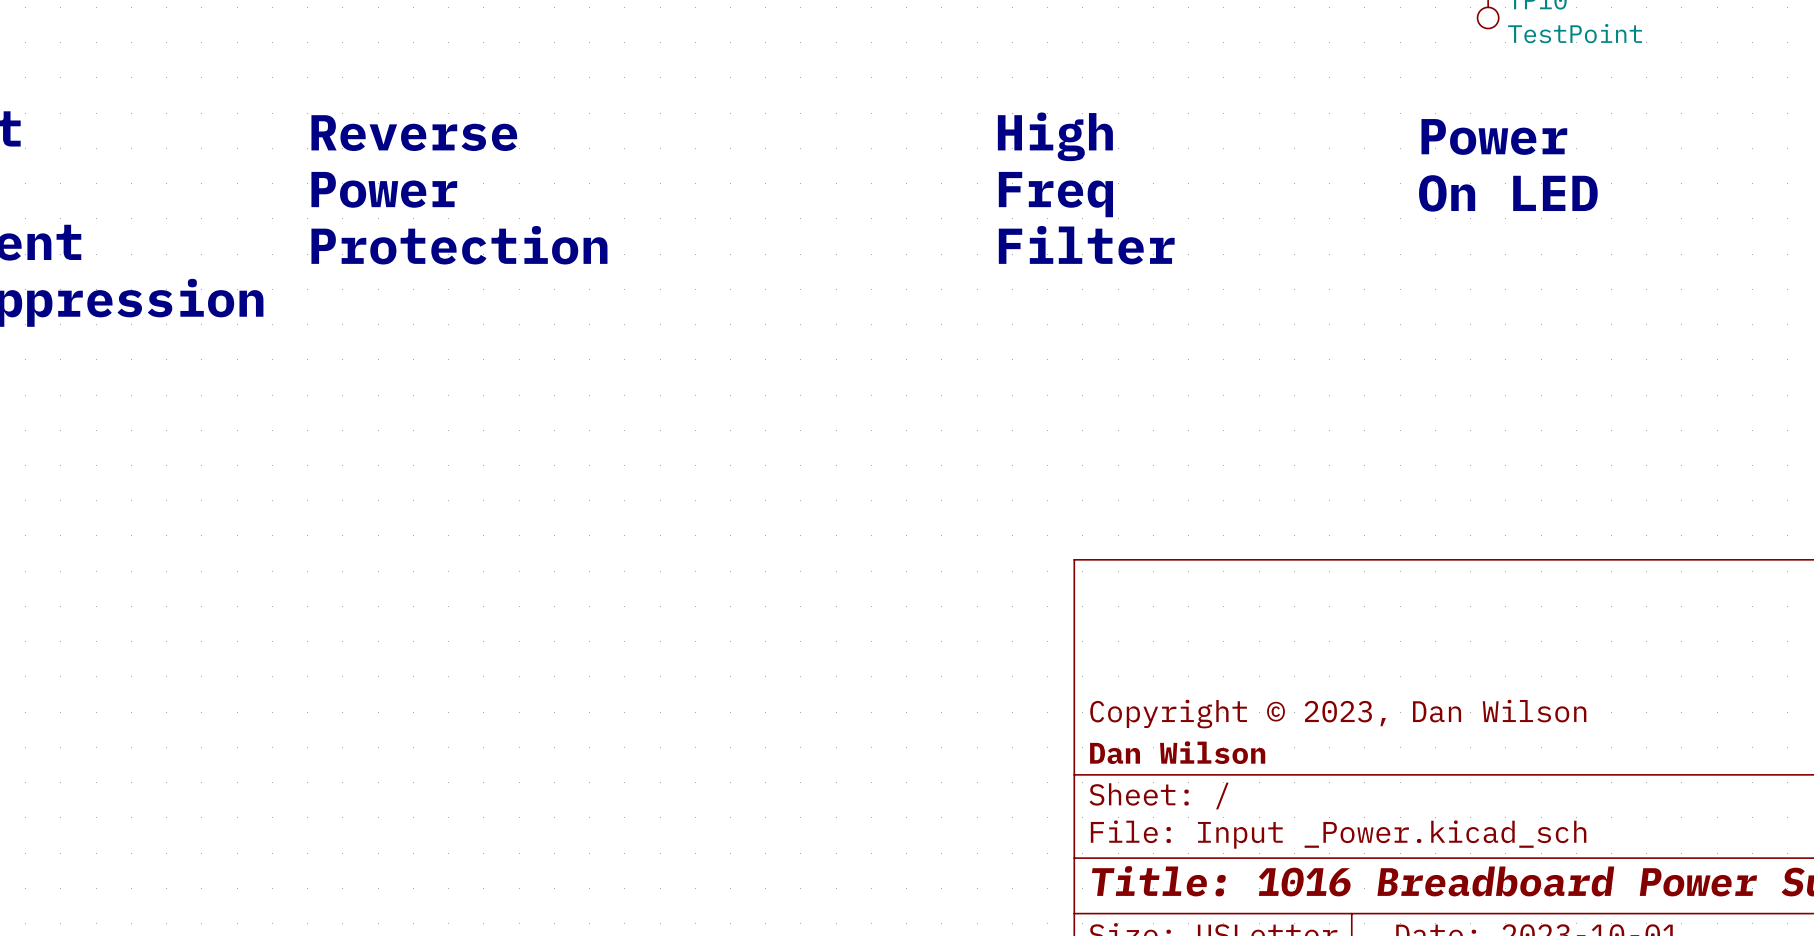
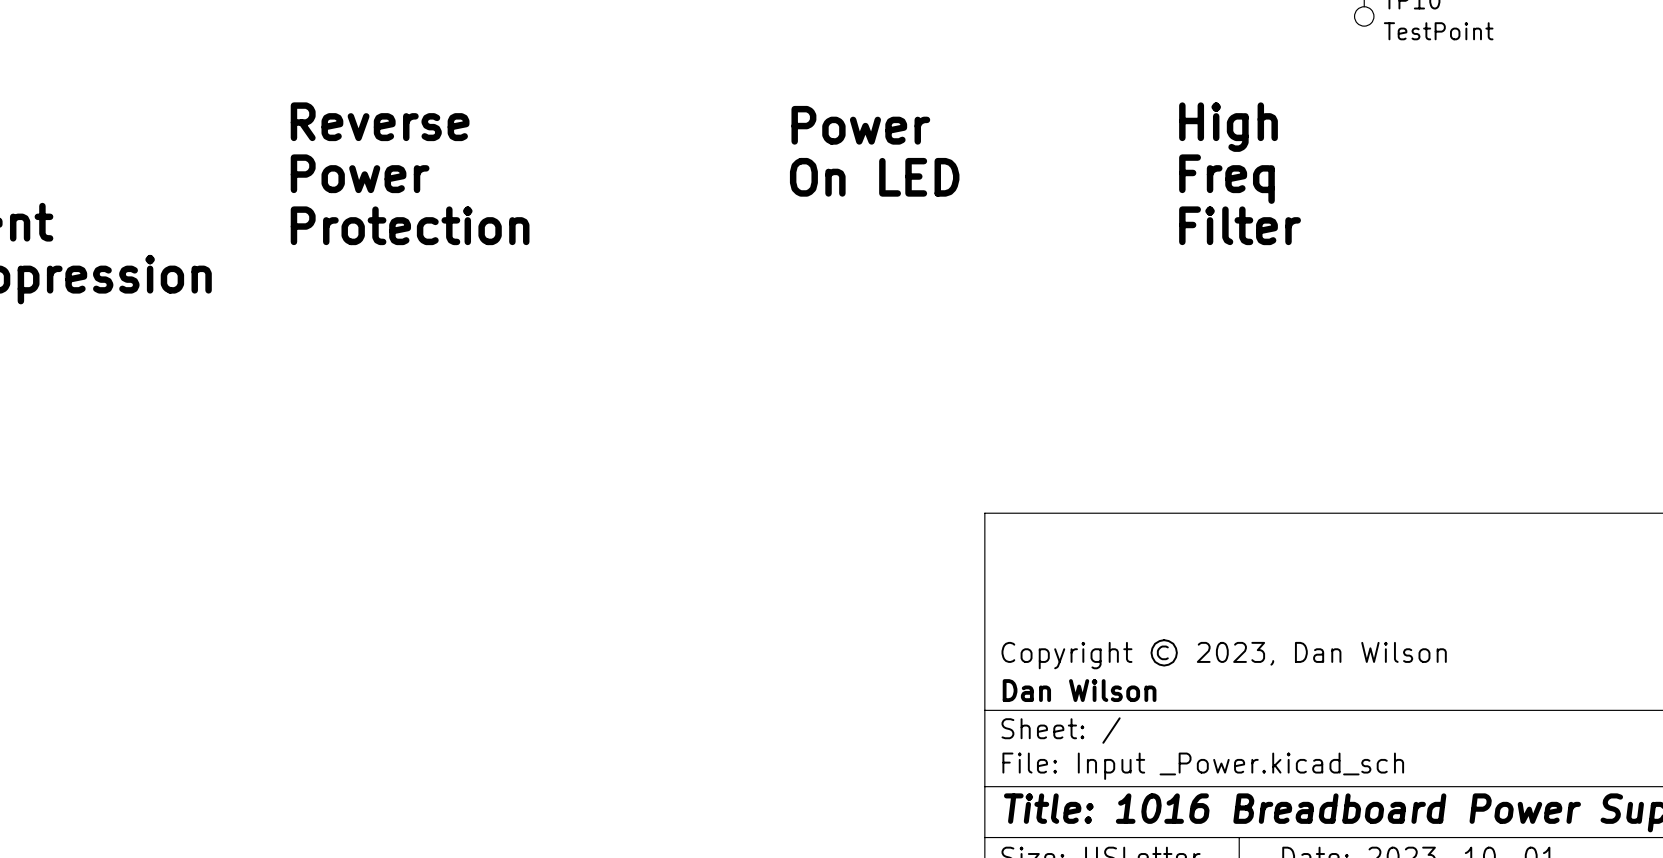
text: none -> Power (860, 125)
text position: High (1055, 136) -> High (1228, 127)
text: Power (1494, 136) -> none
text: none -> On LED (874, 177)
text: On LED (1508, 193) -> none
text position: Freq (1055, 194) -> Freq (1226, 179)
text position: Filter (1086, 245) -> Filter (1240, 225)

